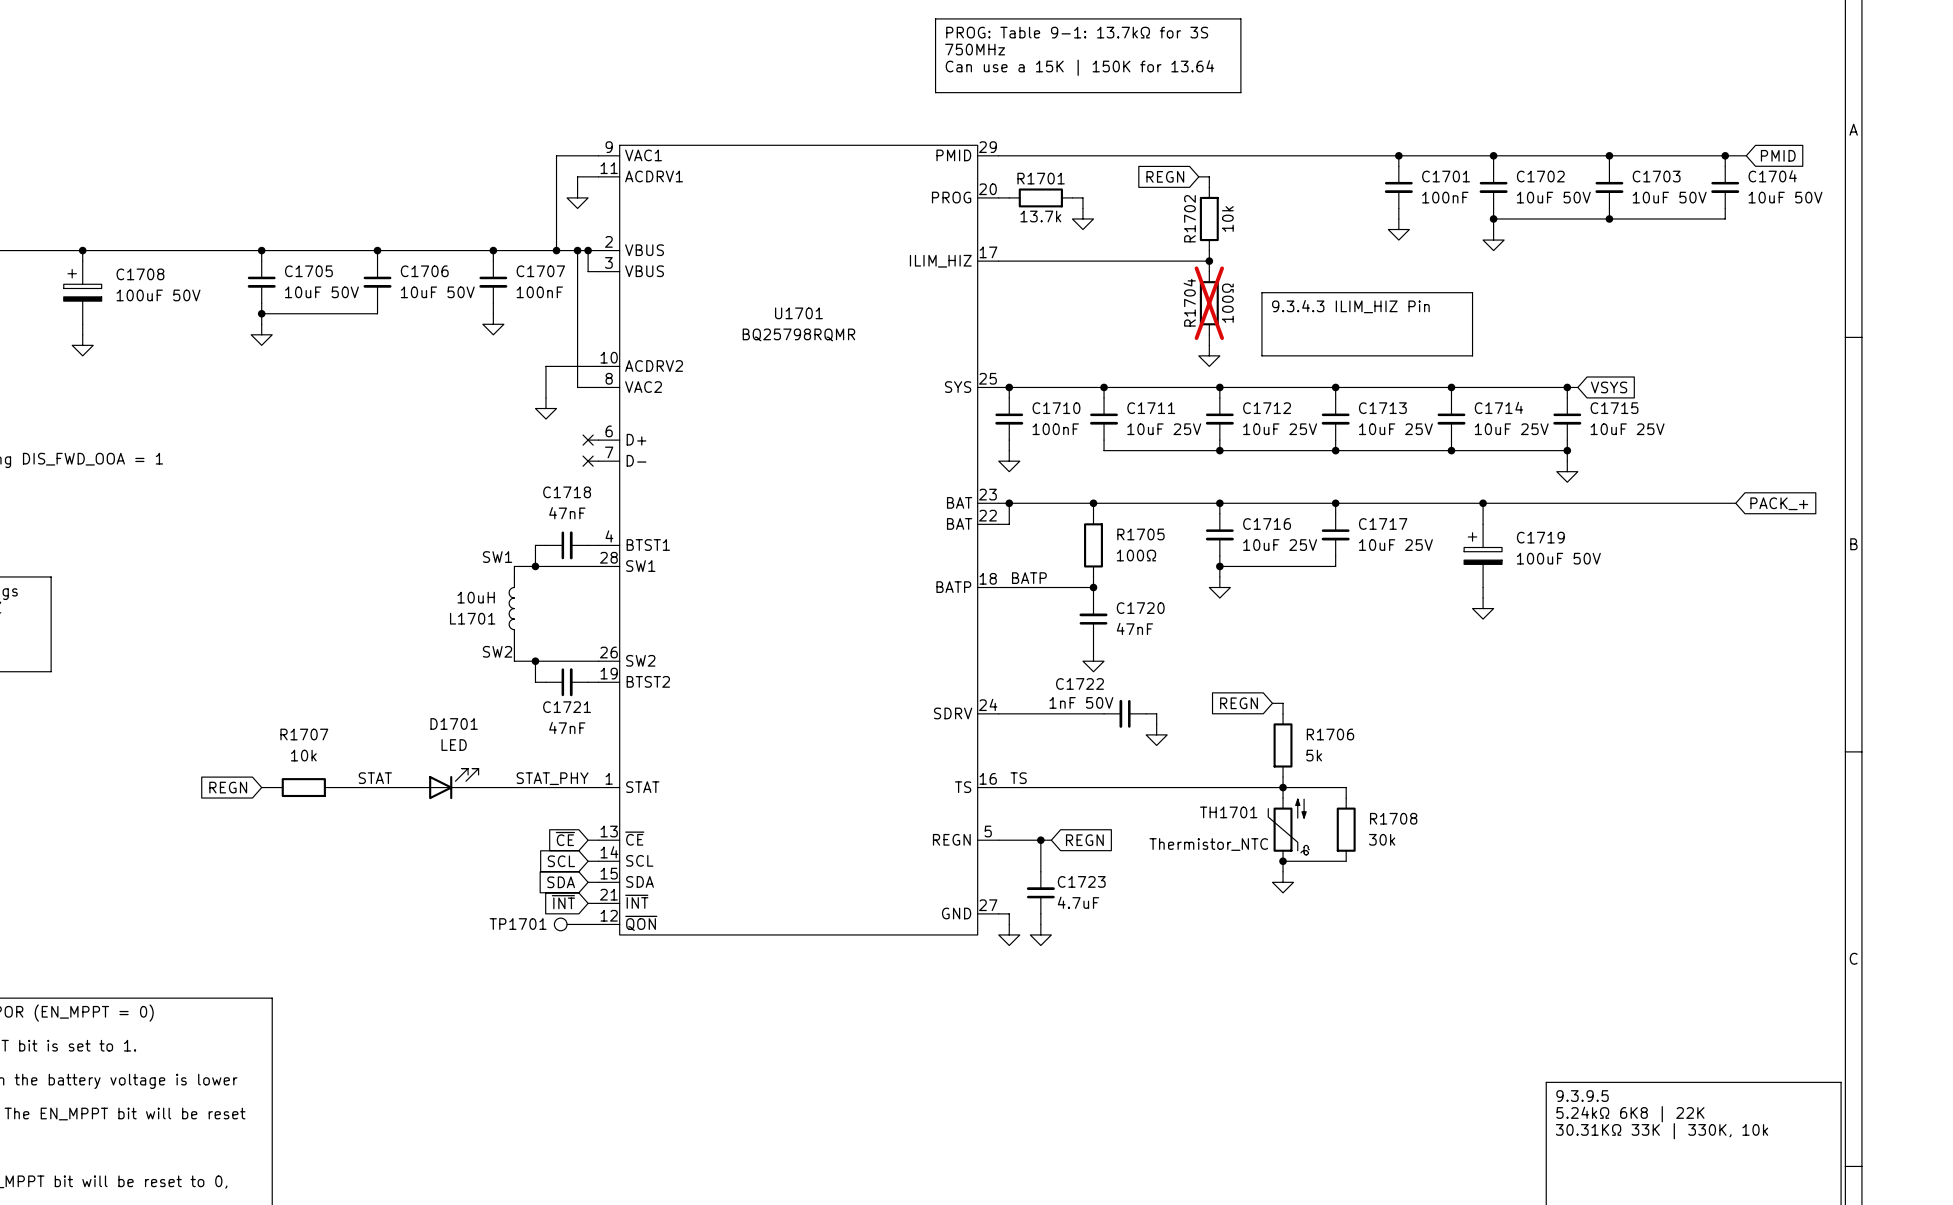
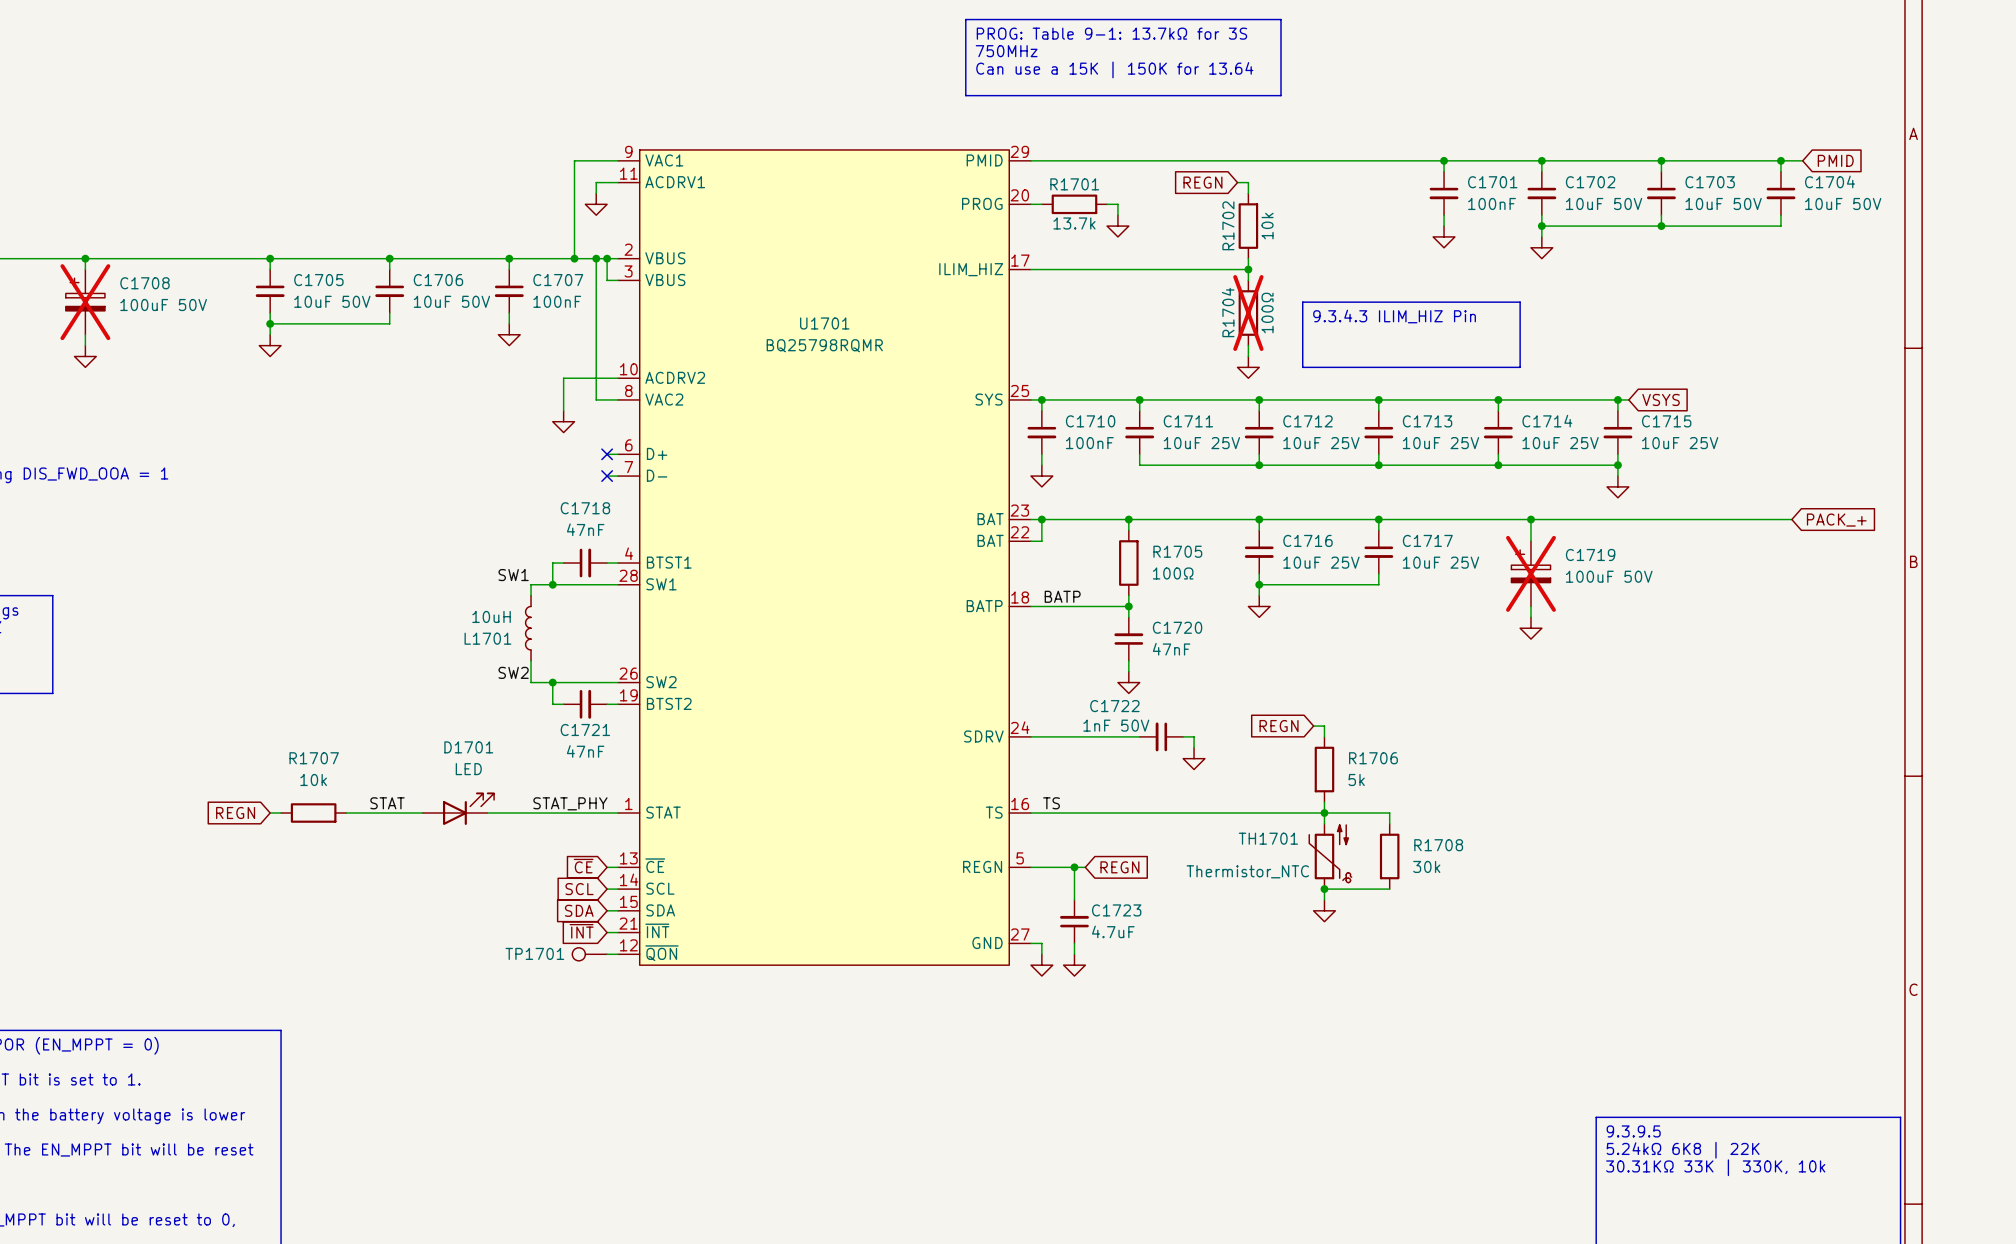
C1708 do-not-place cross: none -> (85, 302)
C1719 do-not-place cross: none -> (1530, 573)

